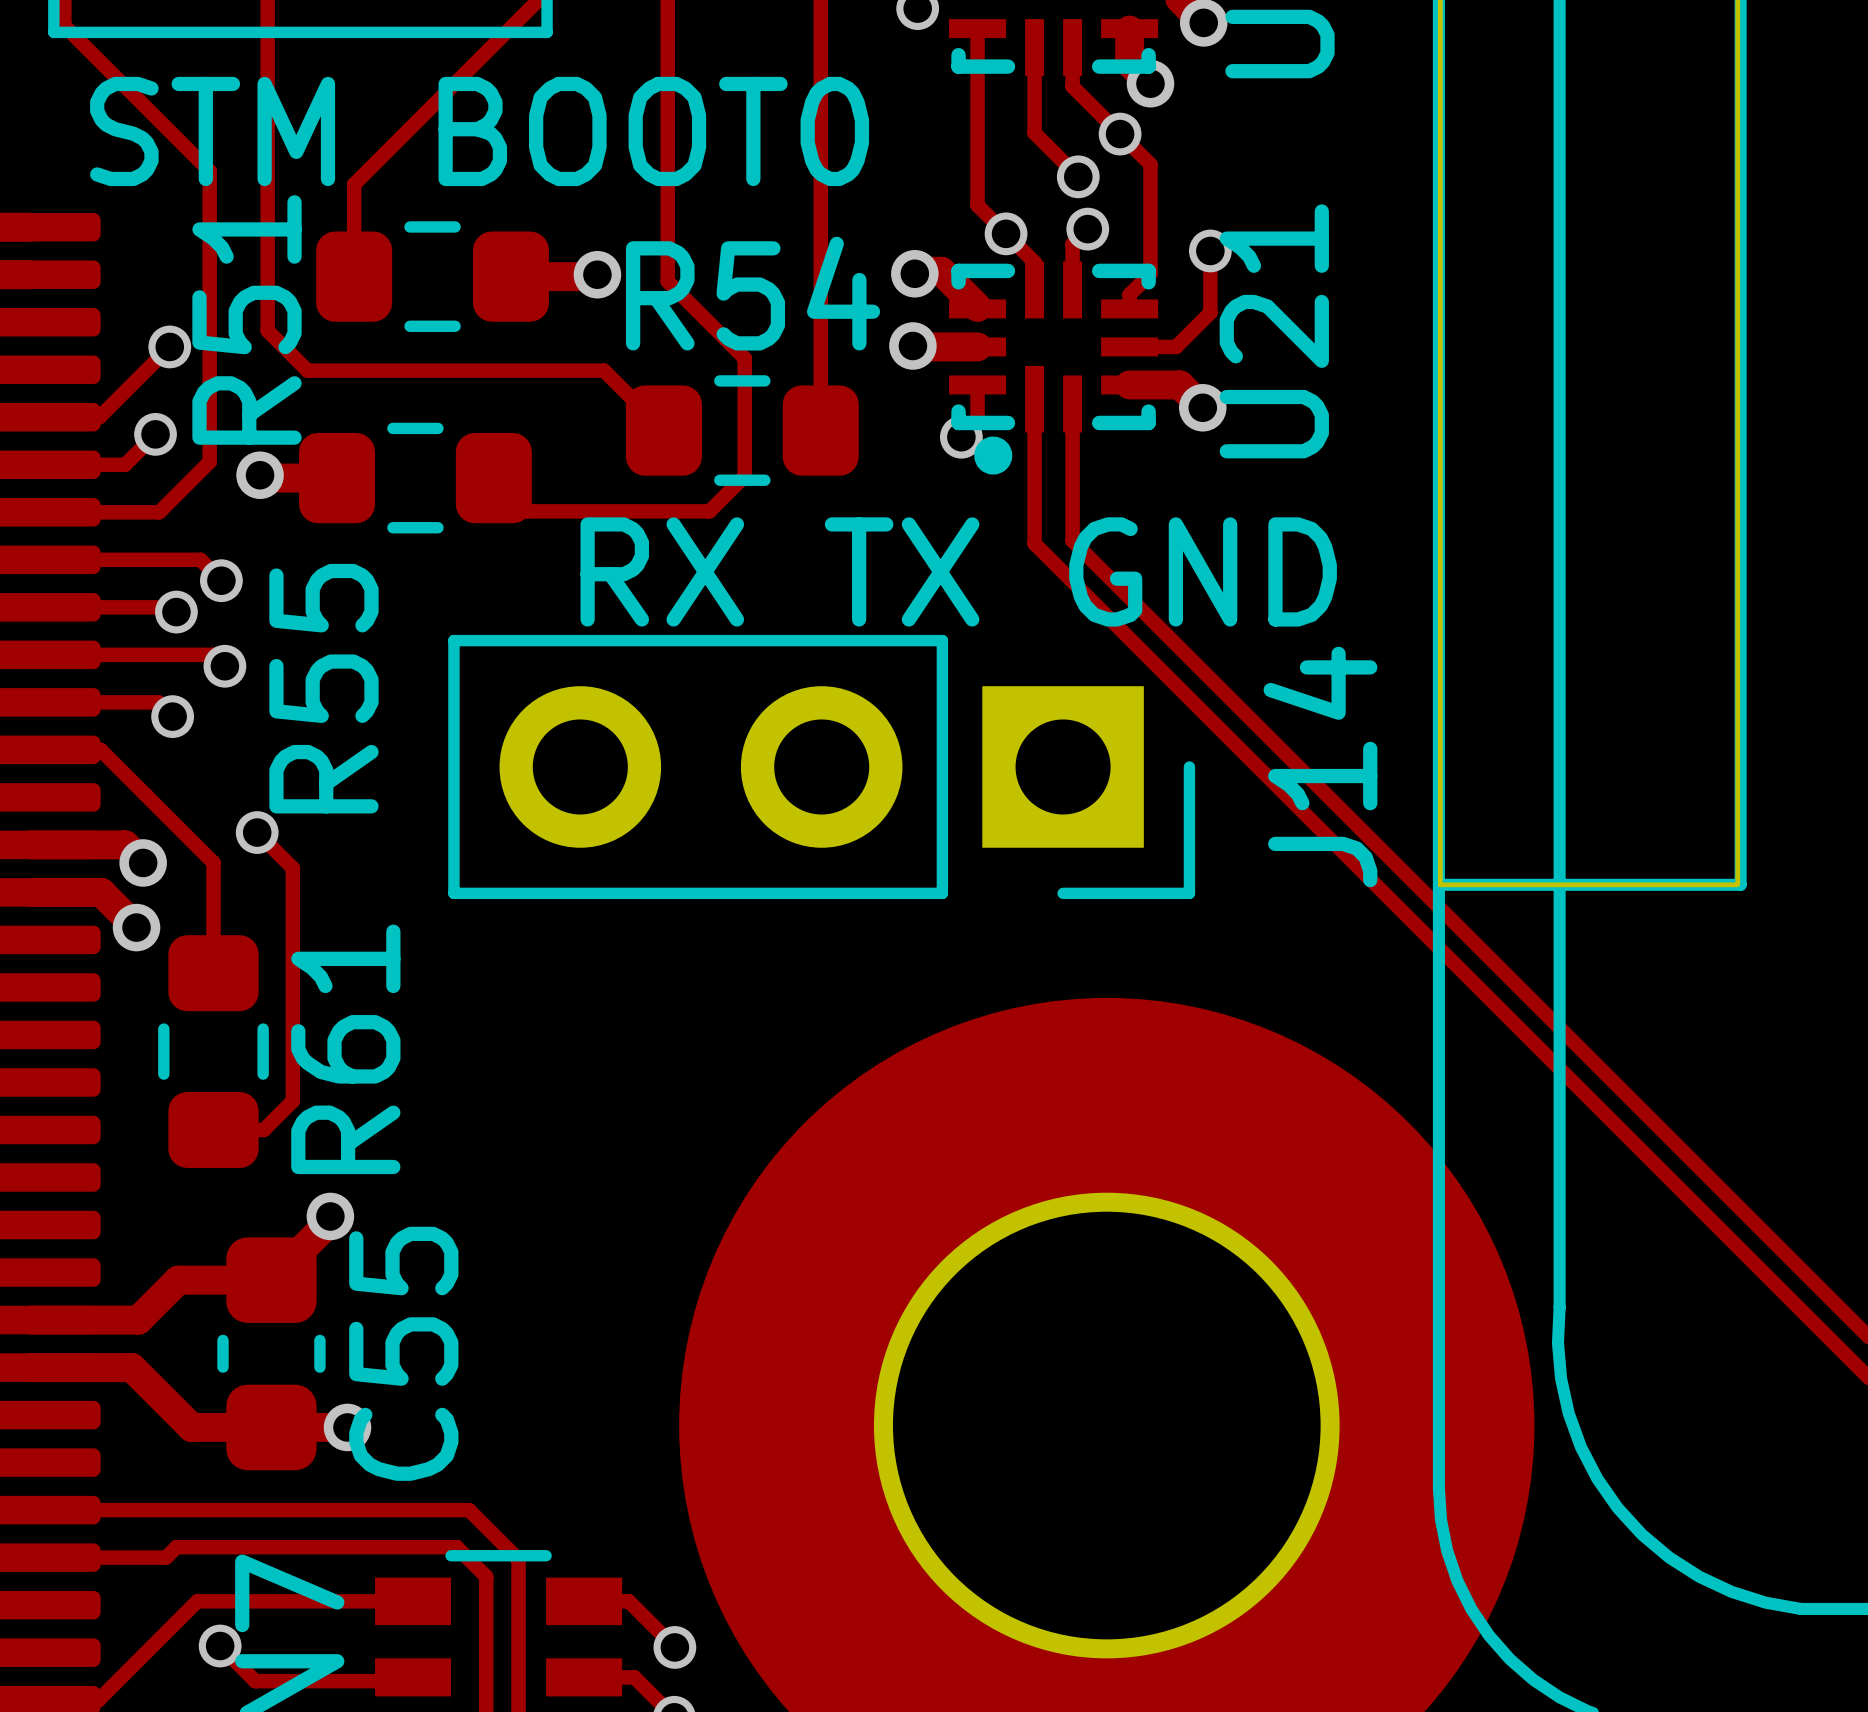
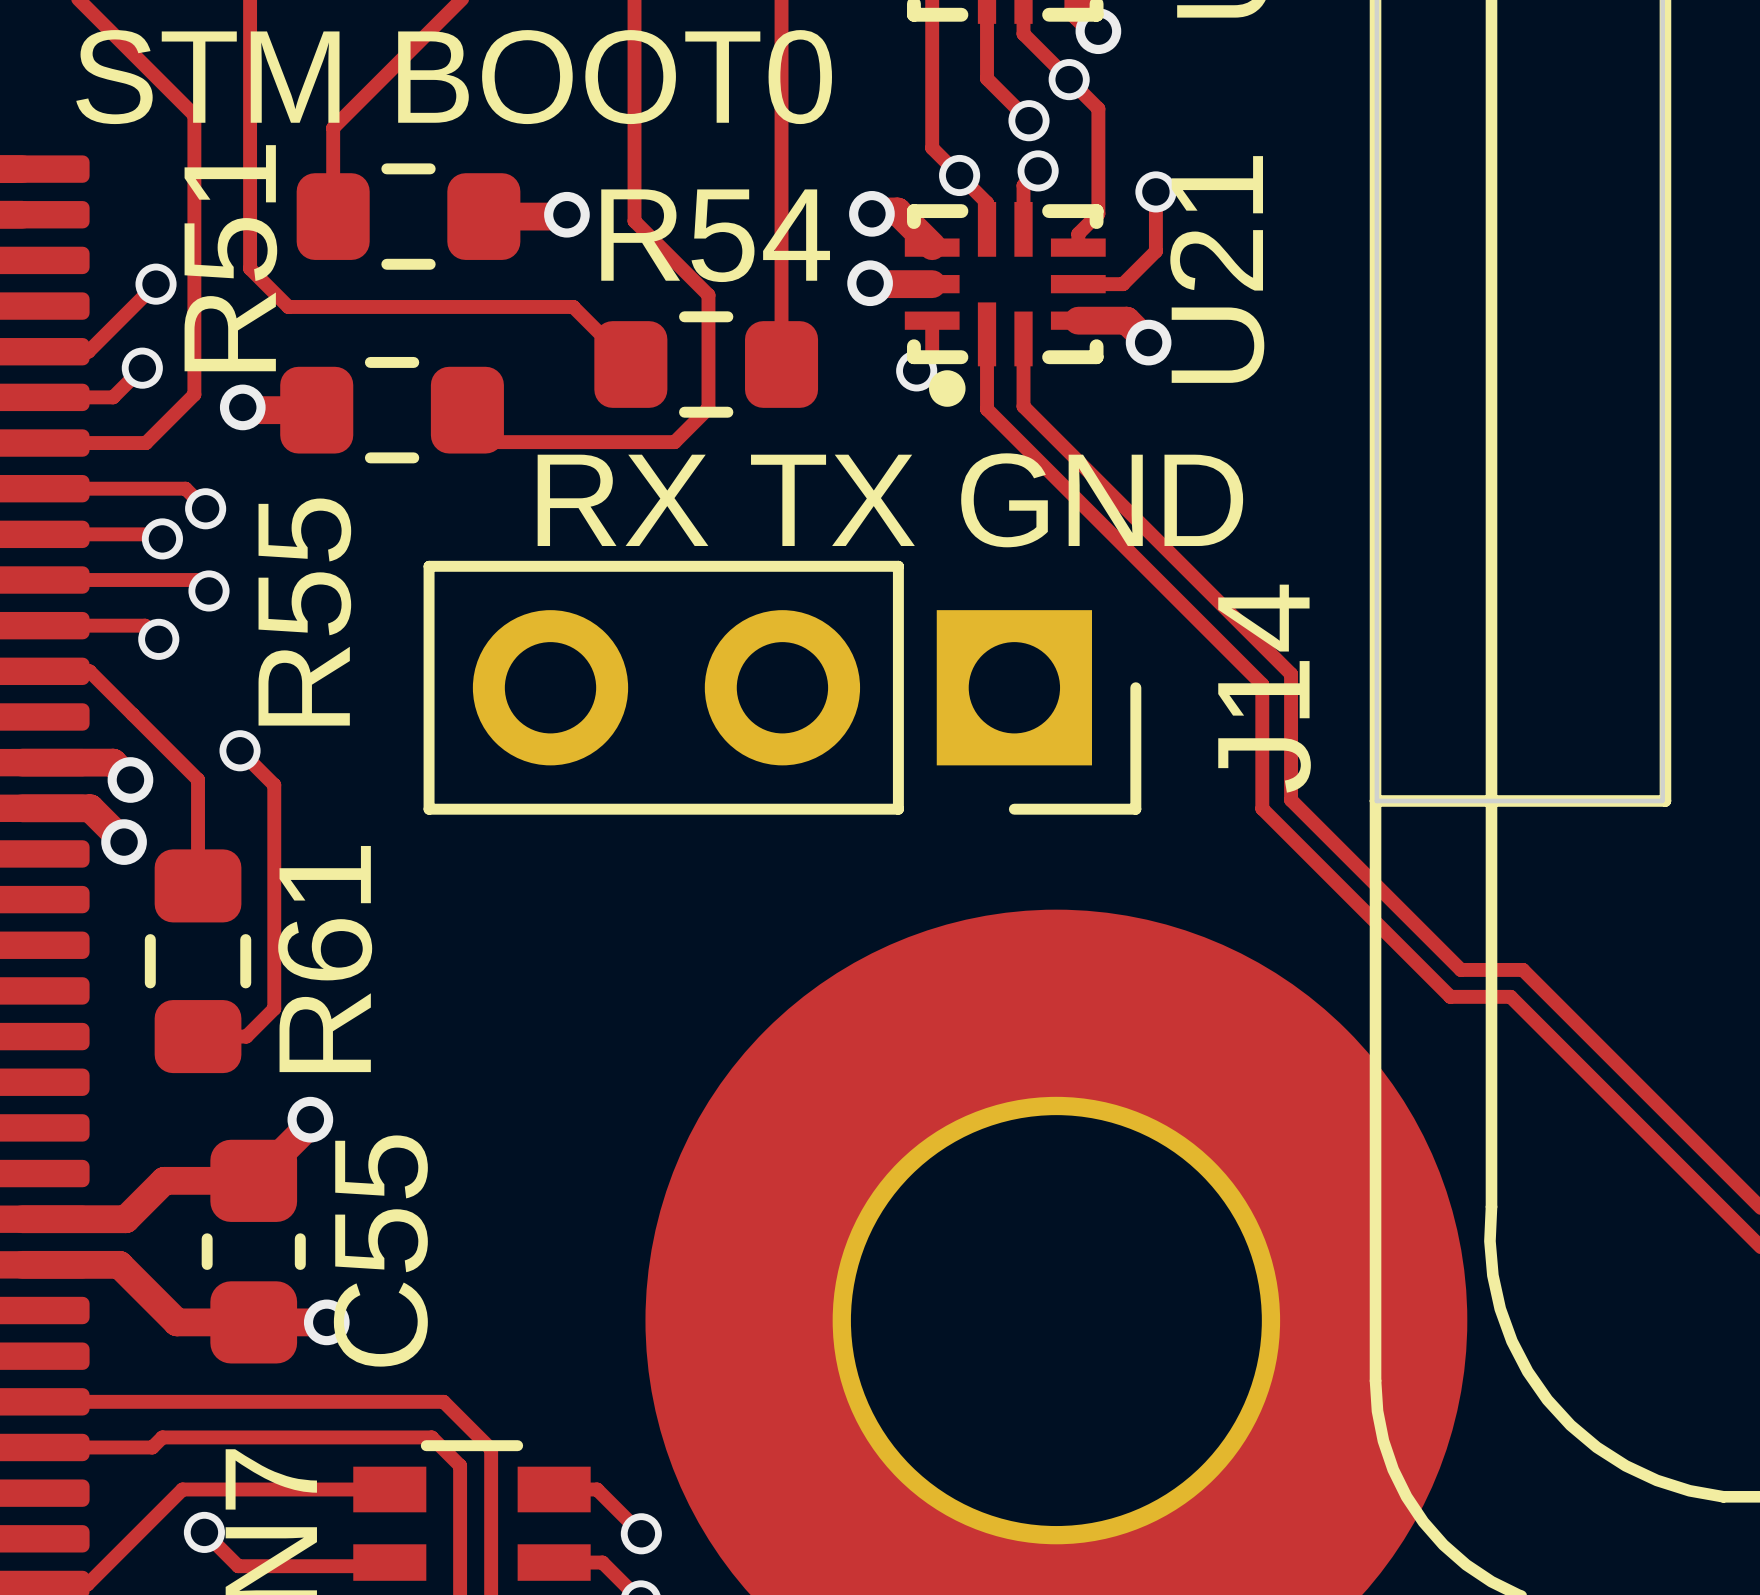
track: (1072, 474) (1072, 540) (1592, 1060) -> (1023, 406) (1291, 674) (1291, 800) (1460, 969) (1522, 969)
track: (1034, 477) (1034, 543) (1579, 1088) -> (987, 409) (1262, 684) (1262, 808) (1450, 996) (1510, 996)

